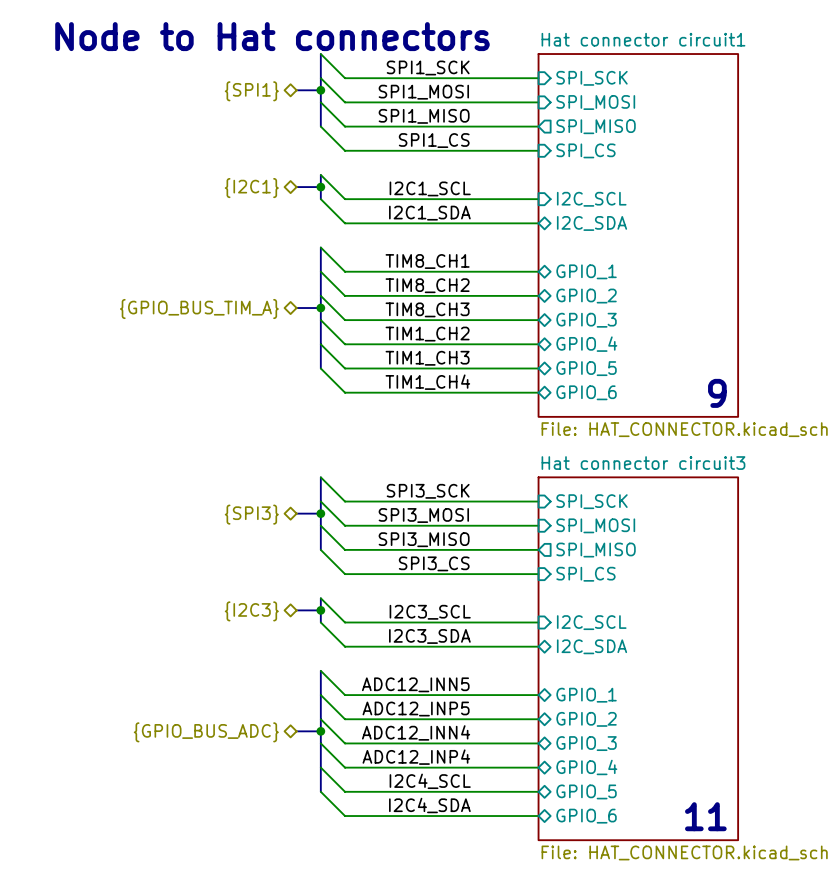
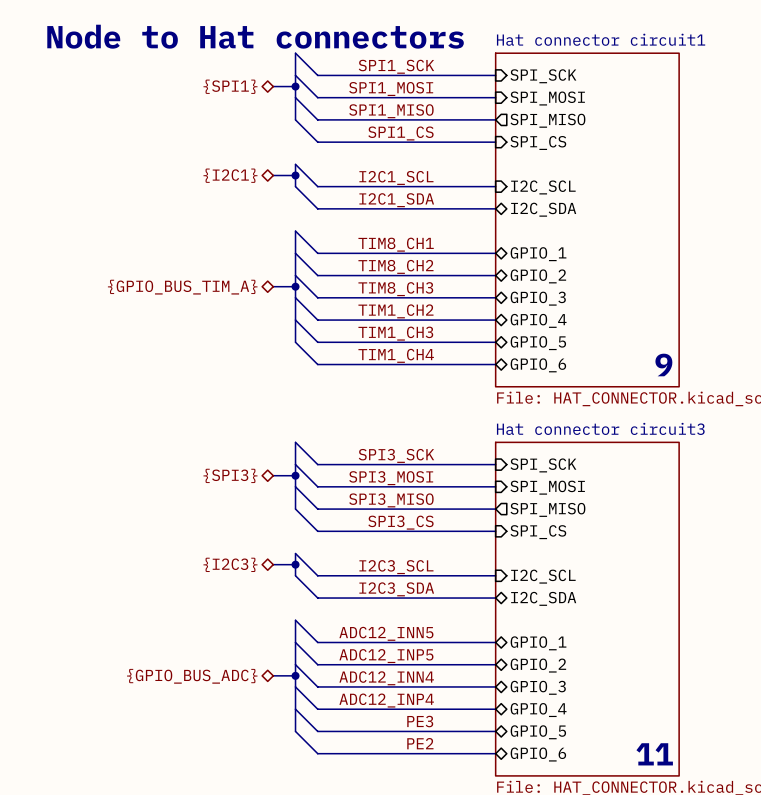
label: I2C4_SCL (430, 781) -> PE3 (420, 721)
label: I2C4_SDA (429, 805) -> PE2 (420, 743)

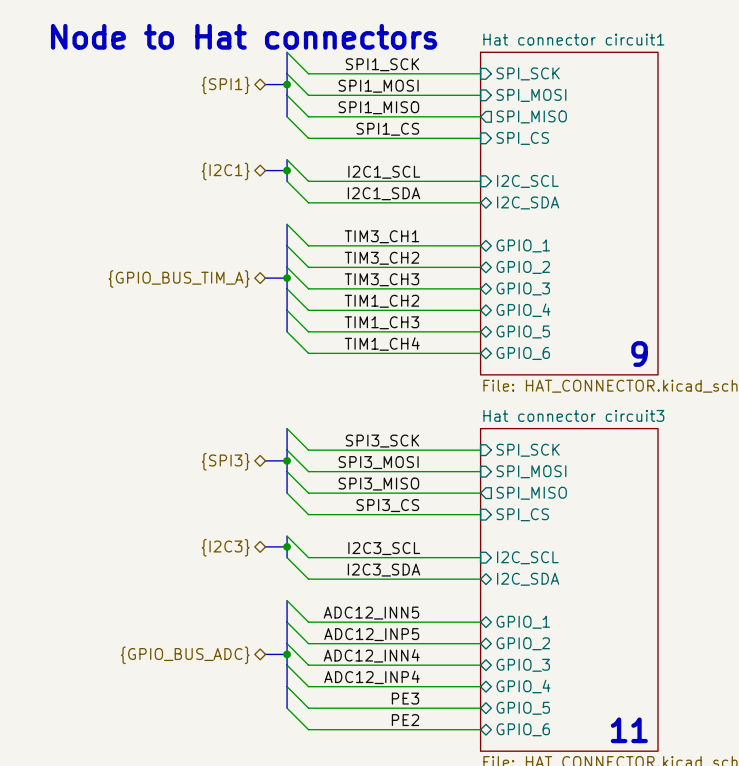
label: TIM8_CH1 (396, 244) -> TIM3_CH1 (381, 236)
label: TIM8_CH2 (395, 266) -> TIM3_CH2 (381, 258)
label: TIM8_CH3 (395, 289) -> TIM3_CH3 (381, 279)

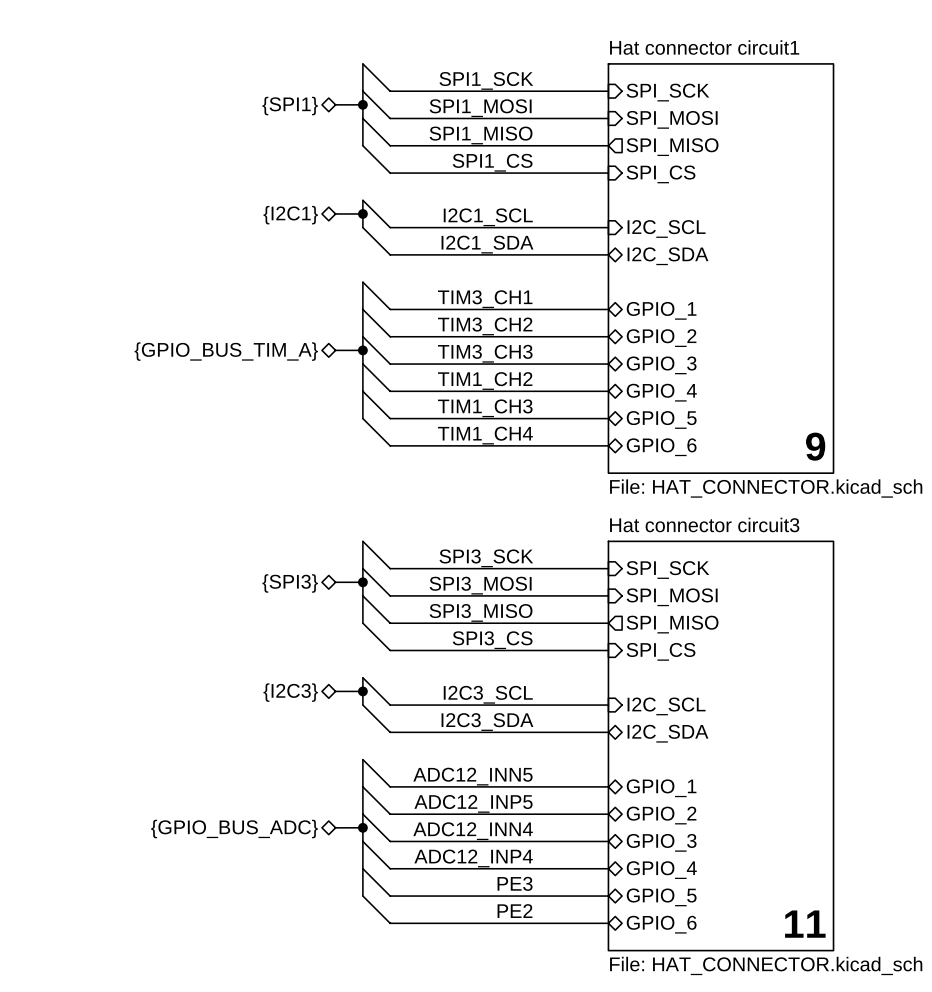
text: Node to Hat connectors (244, 36) -> none

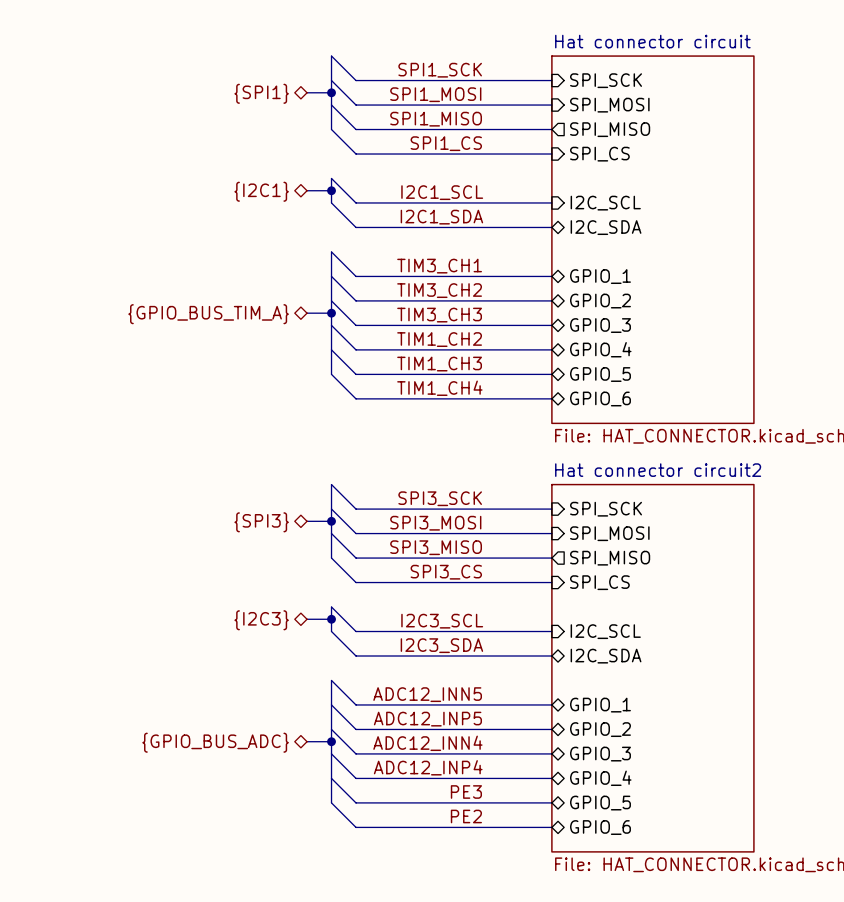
sheet Hat connector circuit1 name: Hat connector circuit1 (704, 47) -> Hat connector circuit (652, 41)
text: 9 (815, 446) -> none
sheet Hat connector circuit3 name: Hat connector circuit3 (704, 524) -> Hat connector circuit2 (658, 470)
text: 11 (805, 924) -> none

